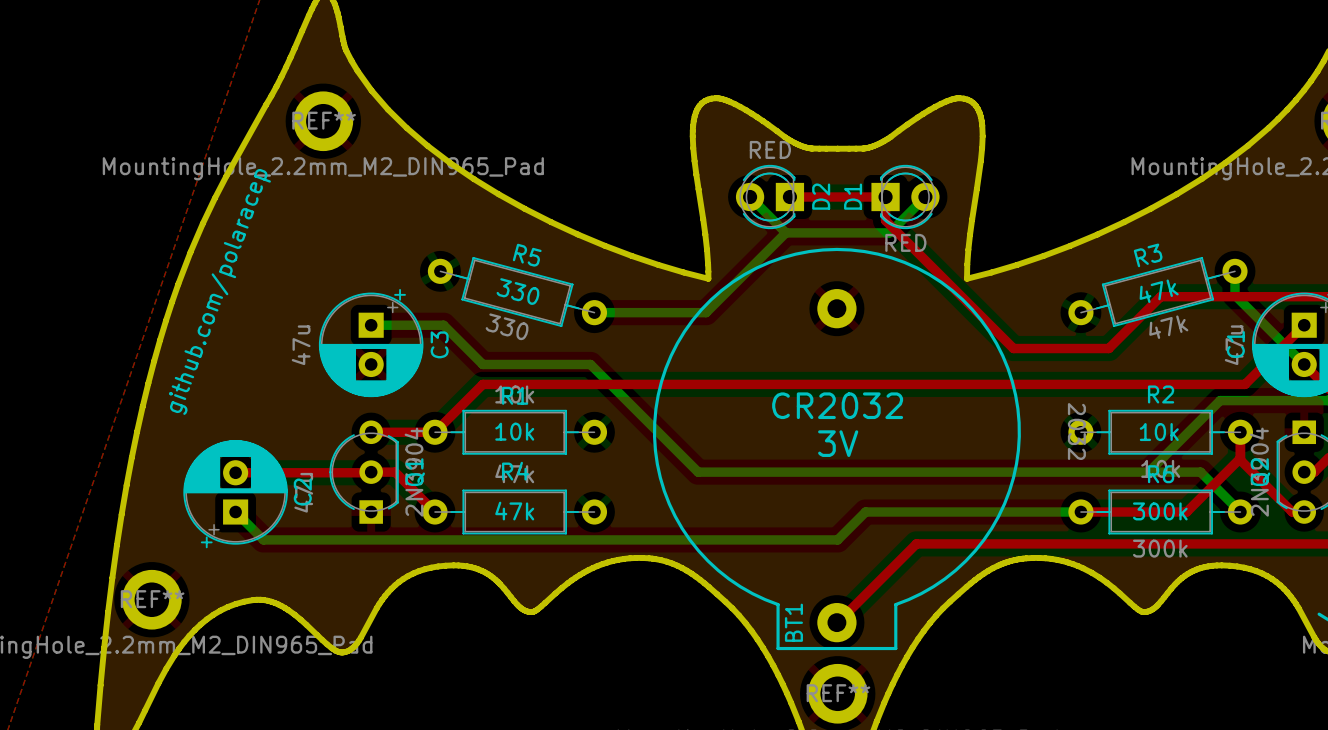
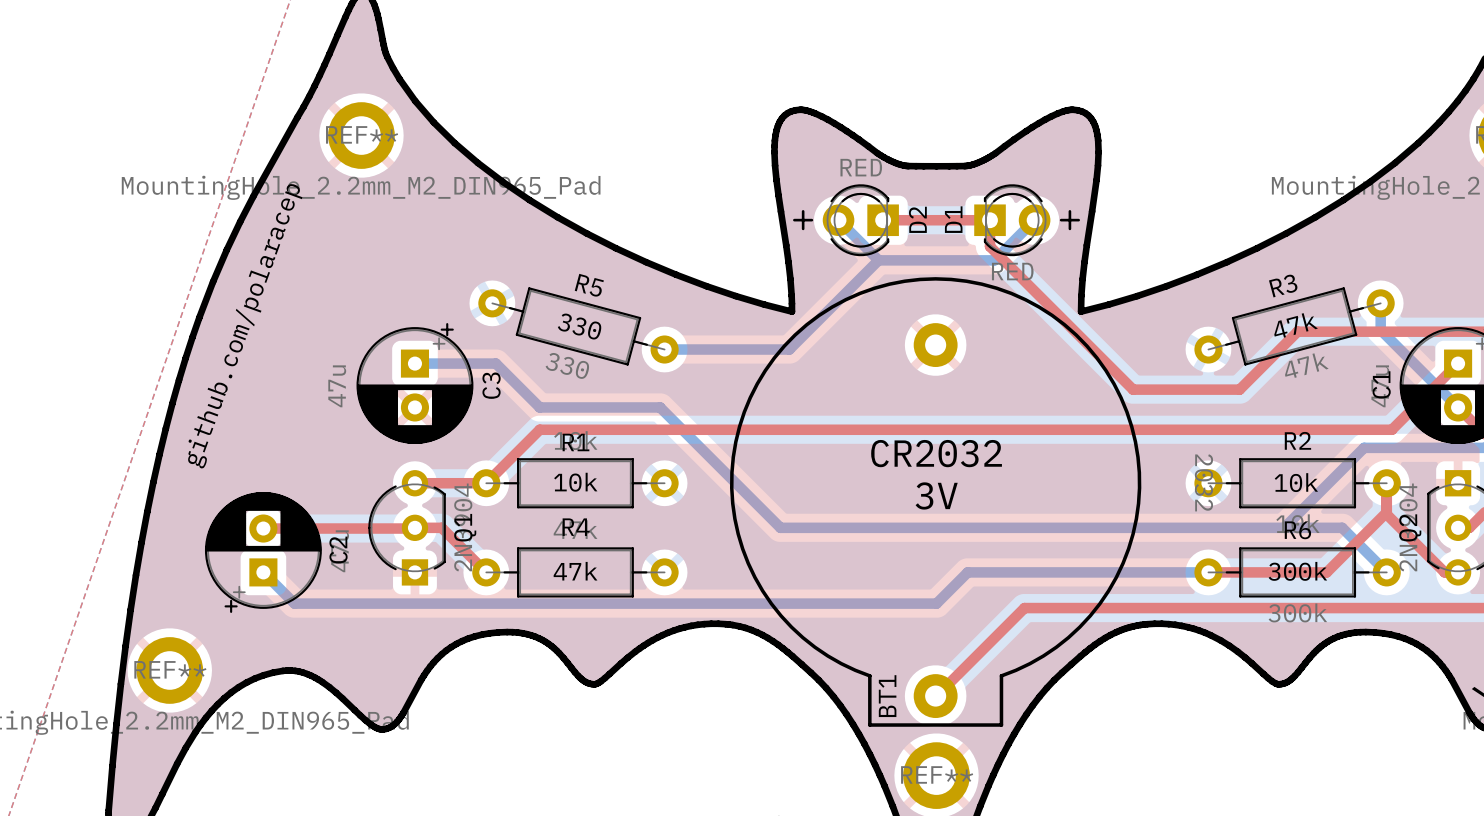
line: none -> (803, 211) (803, 228)
line: none -> (1069, 211) (1069, 228)
line: none -> (794, 220) (811, 220)
line: none -> (1061, 220) (1078, 220)

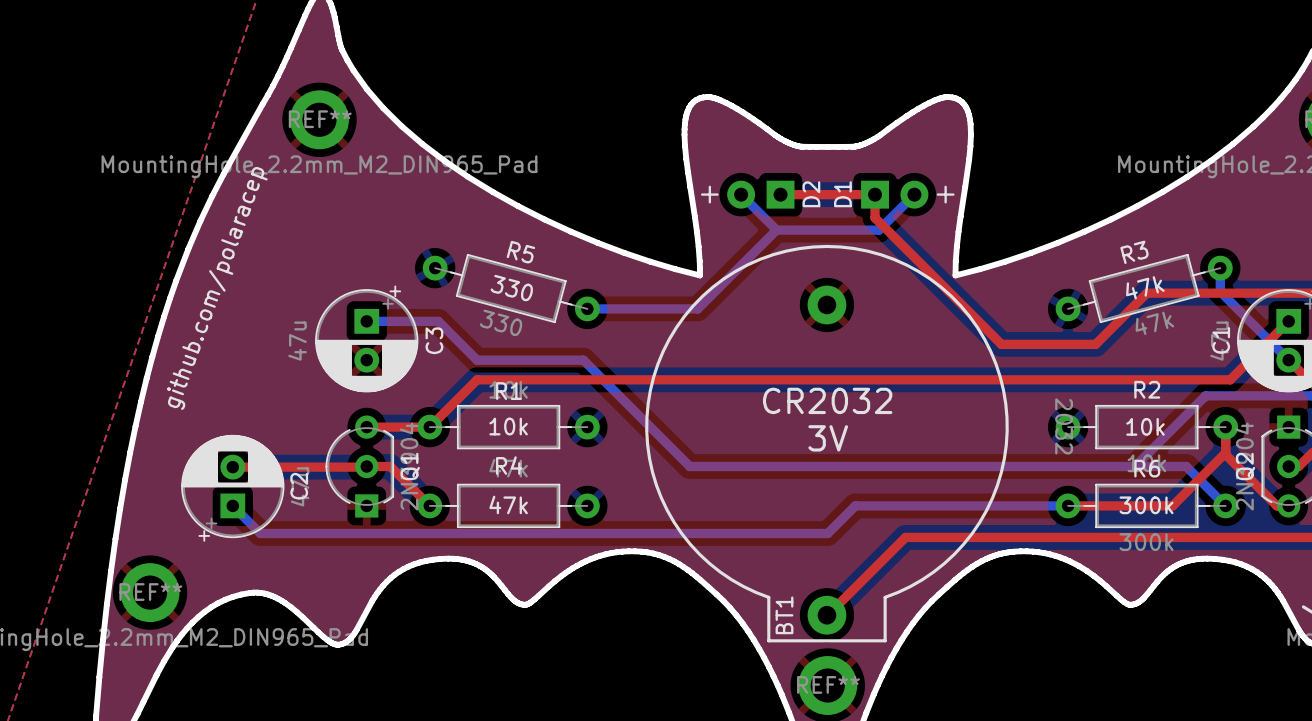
D2 side: top (860, 220) -> bottom (760, 194)
D1 side: top (1012, 220) -> bottom (894, 194)

